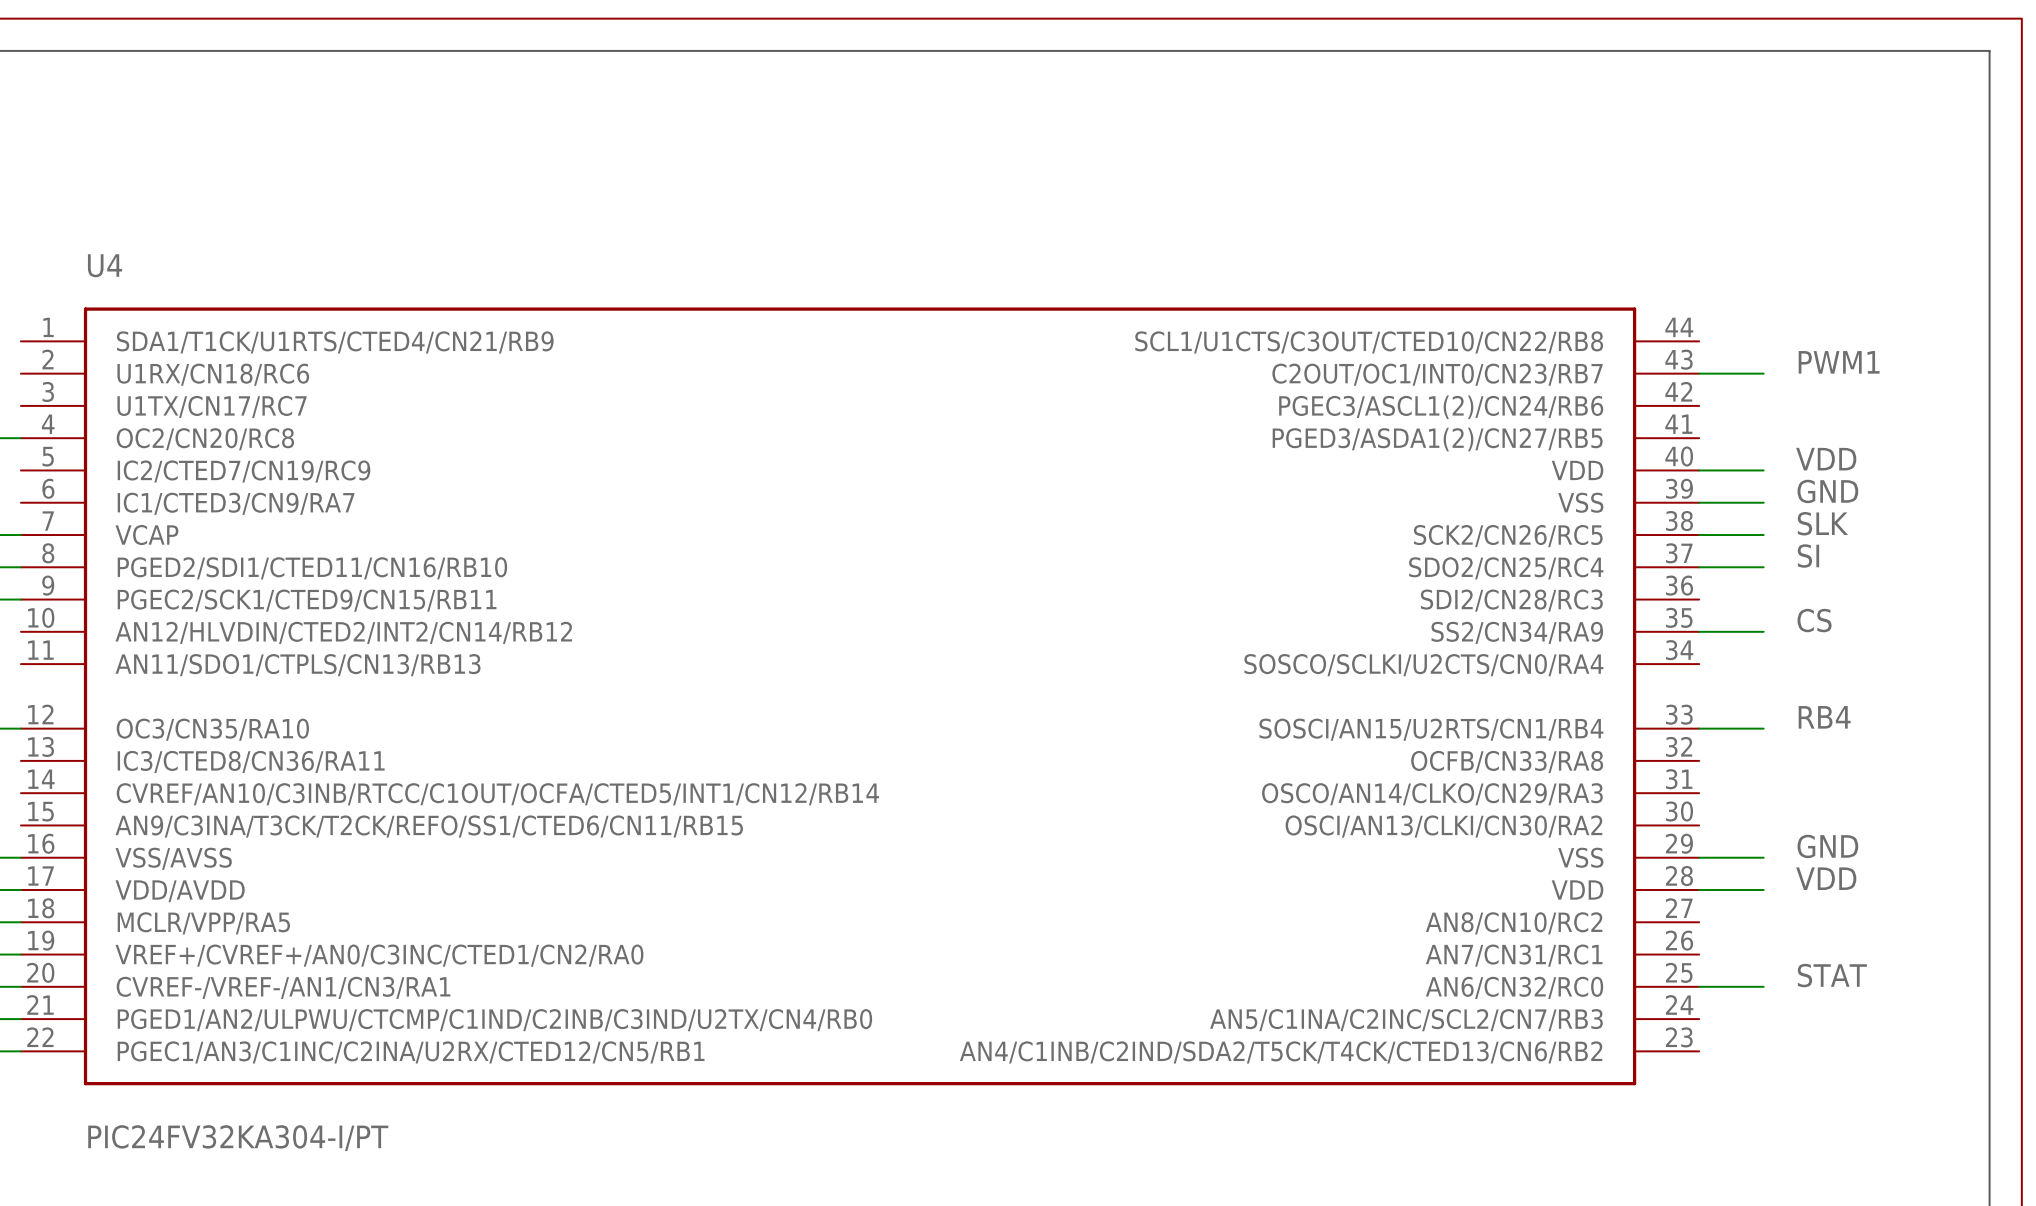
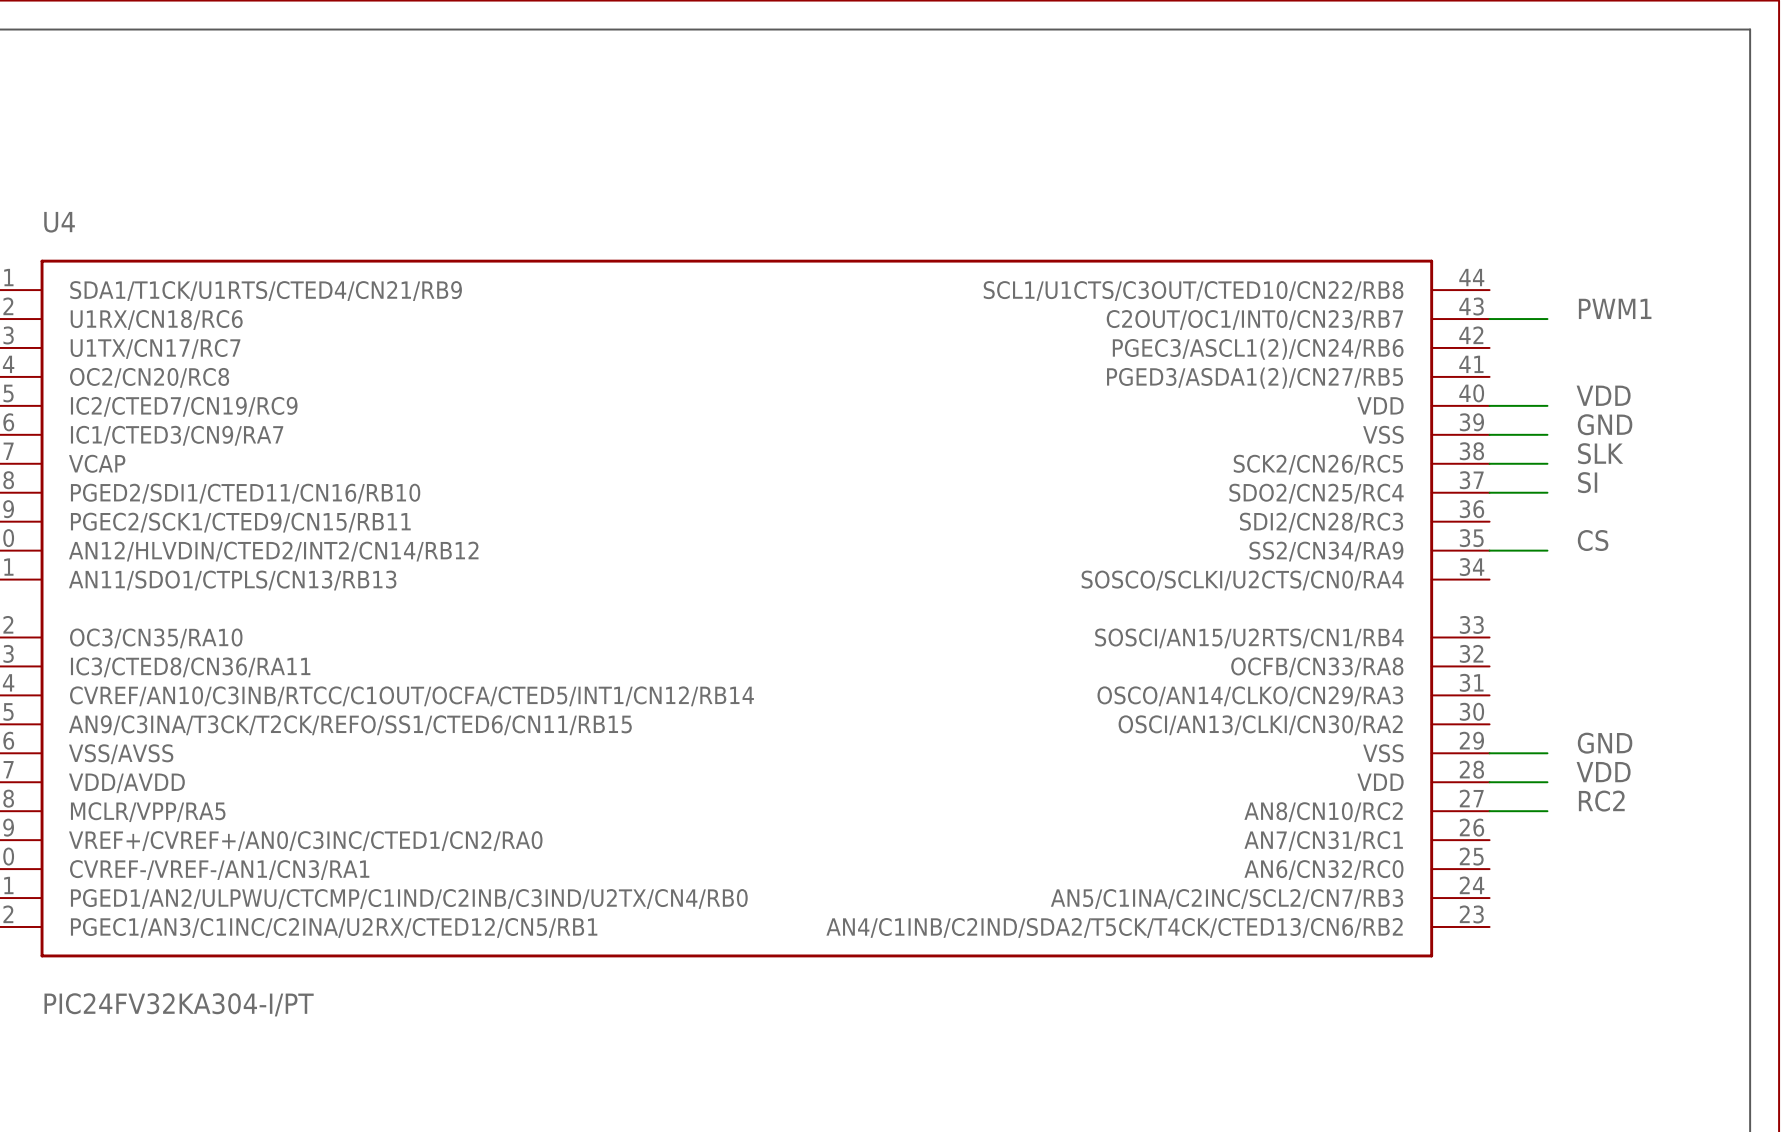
label: RB4 (1824, 717) -> none
wire: (1699, 728) (1763, 728) -> none
label: none -> RC2 (1601, 801)
label: STAT (1832, 975) -> none
wire: (1699, 986) (1763, 986) -> (1489, 811) (1547, 811)

